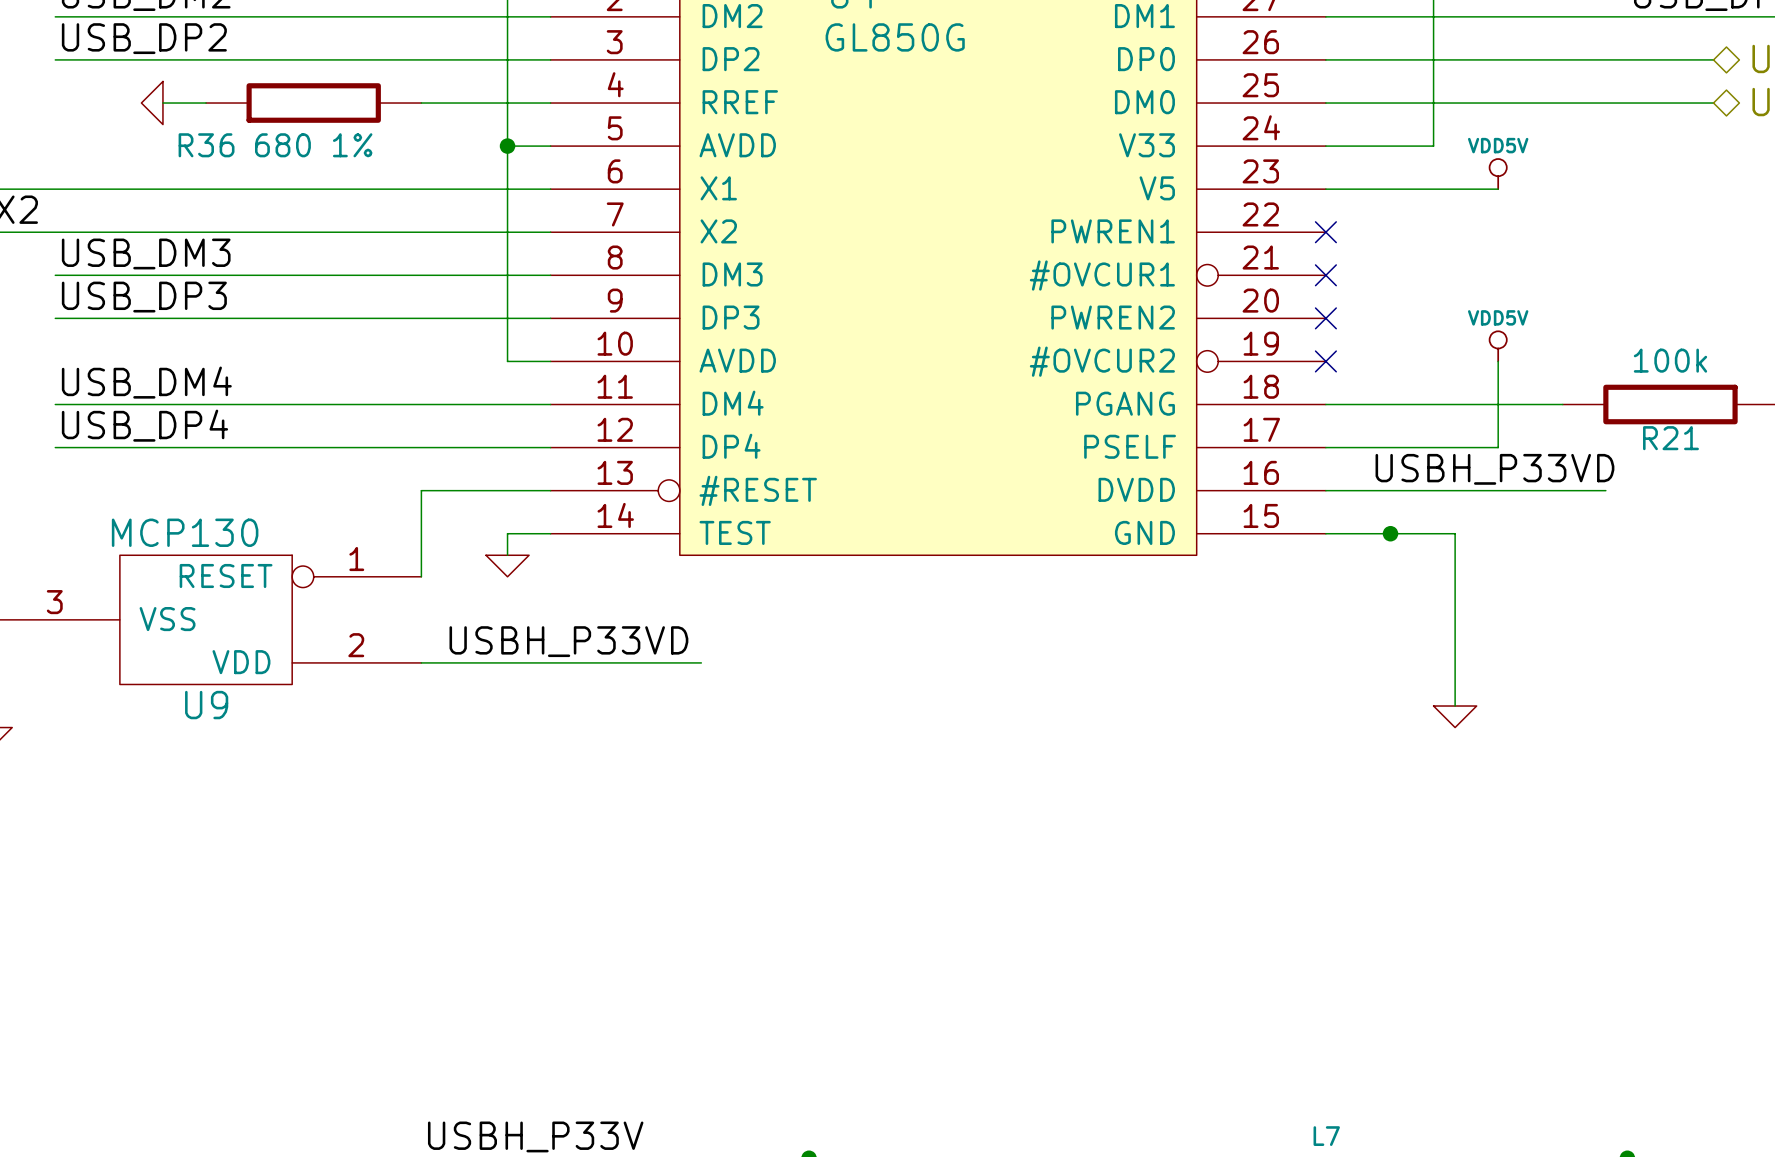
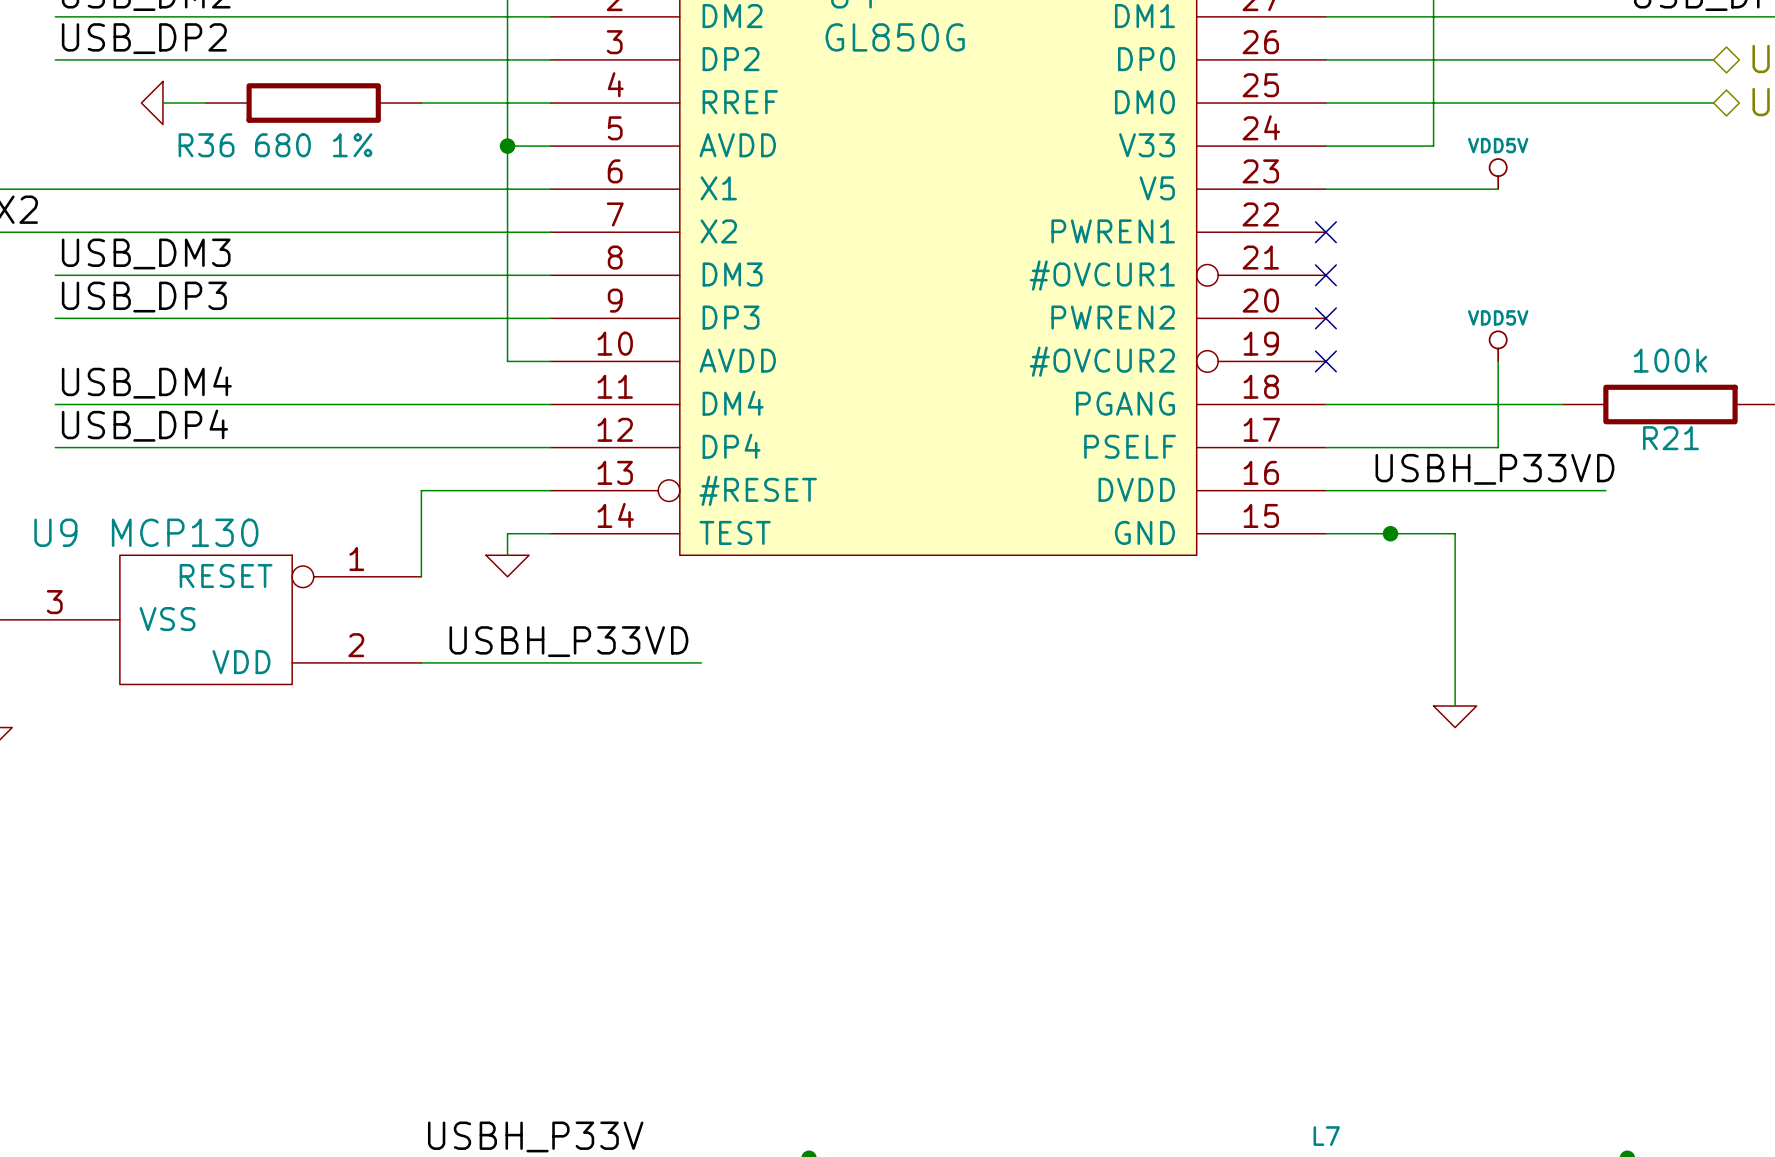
U9 name position: U9 (206, 705) -> U9 (55, 532)

